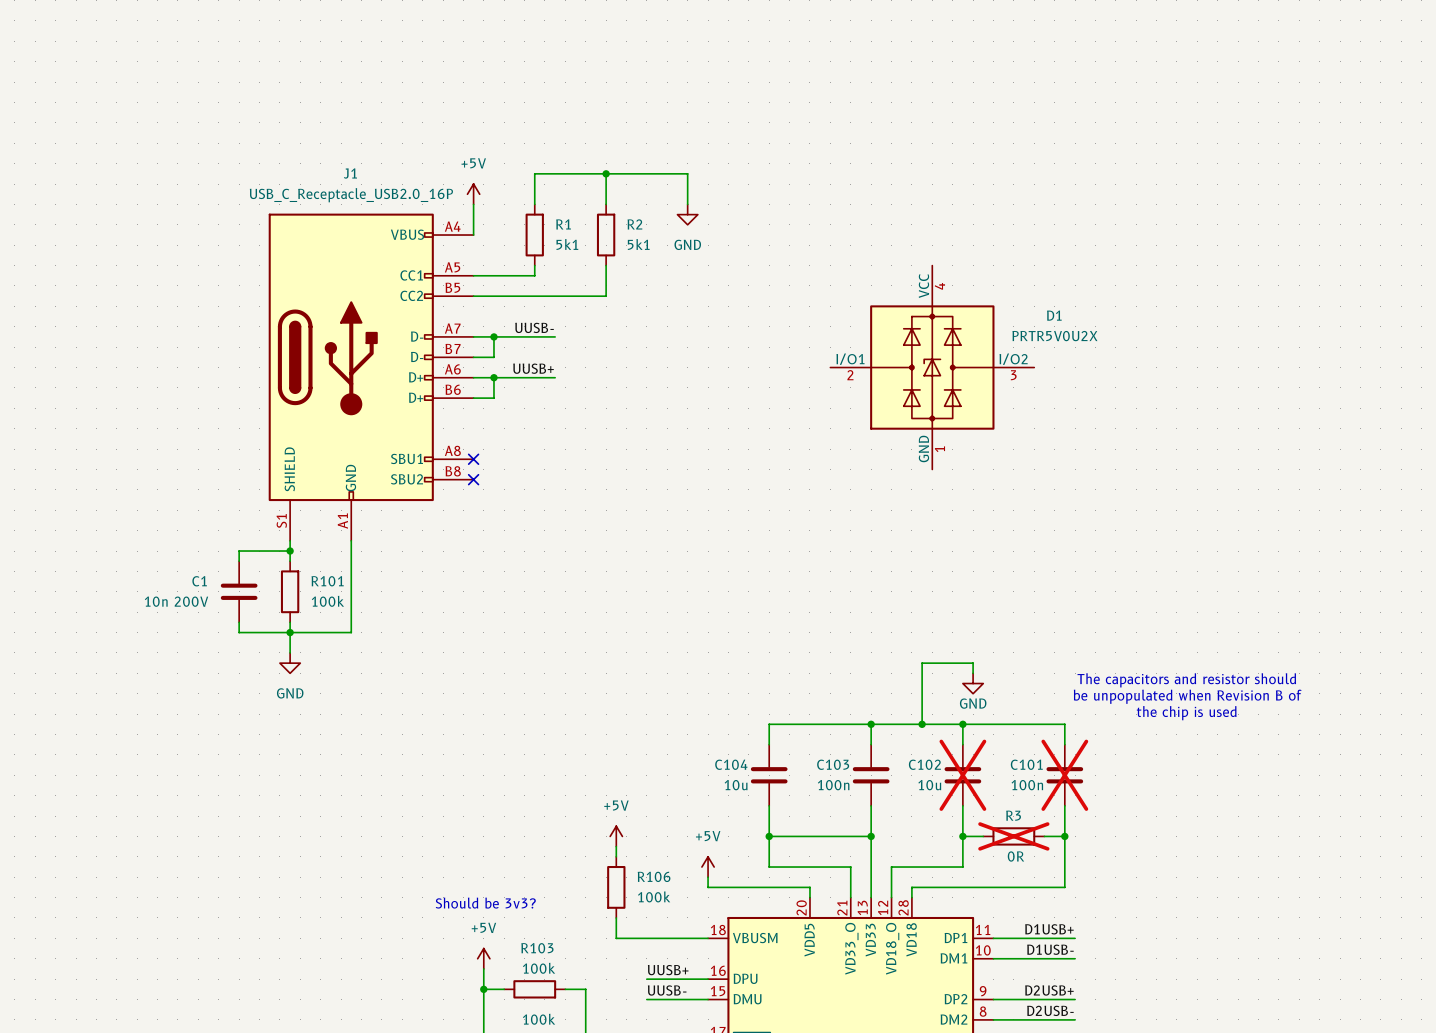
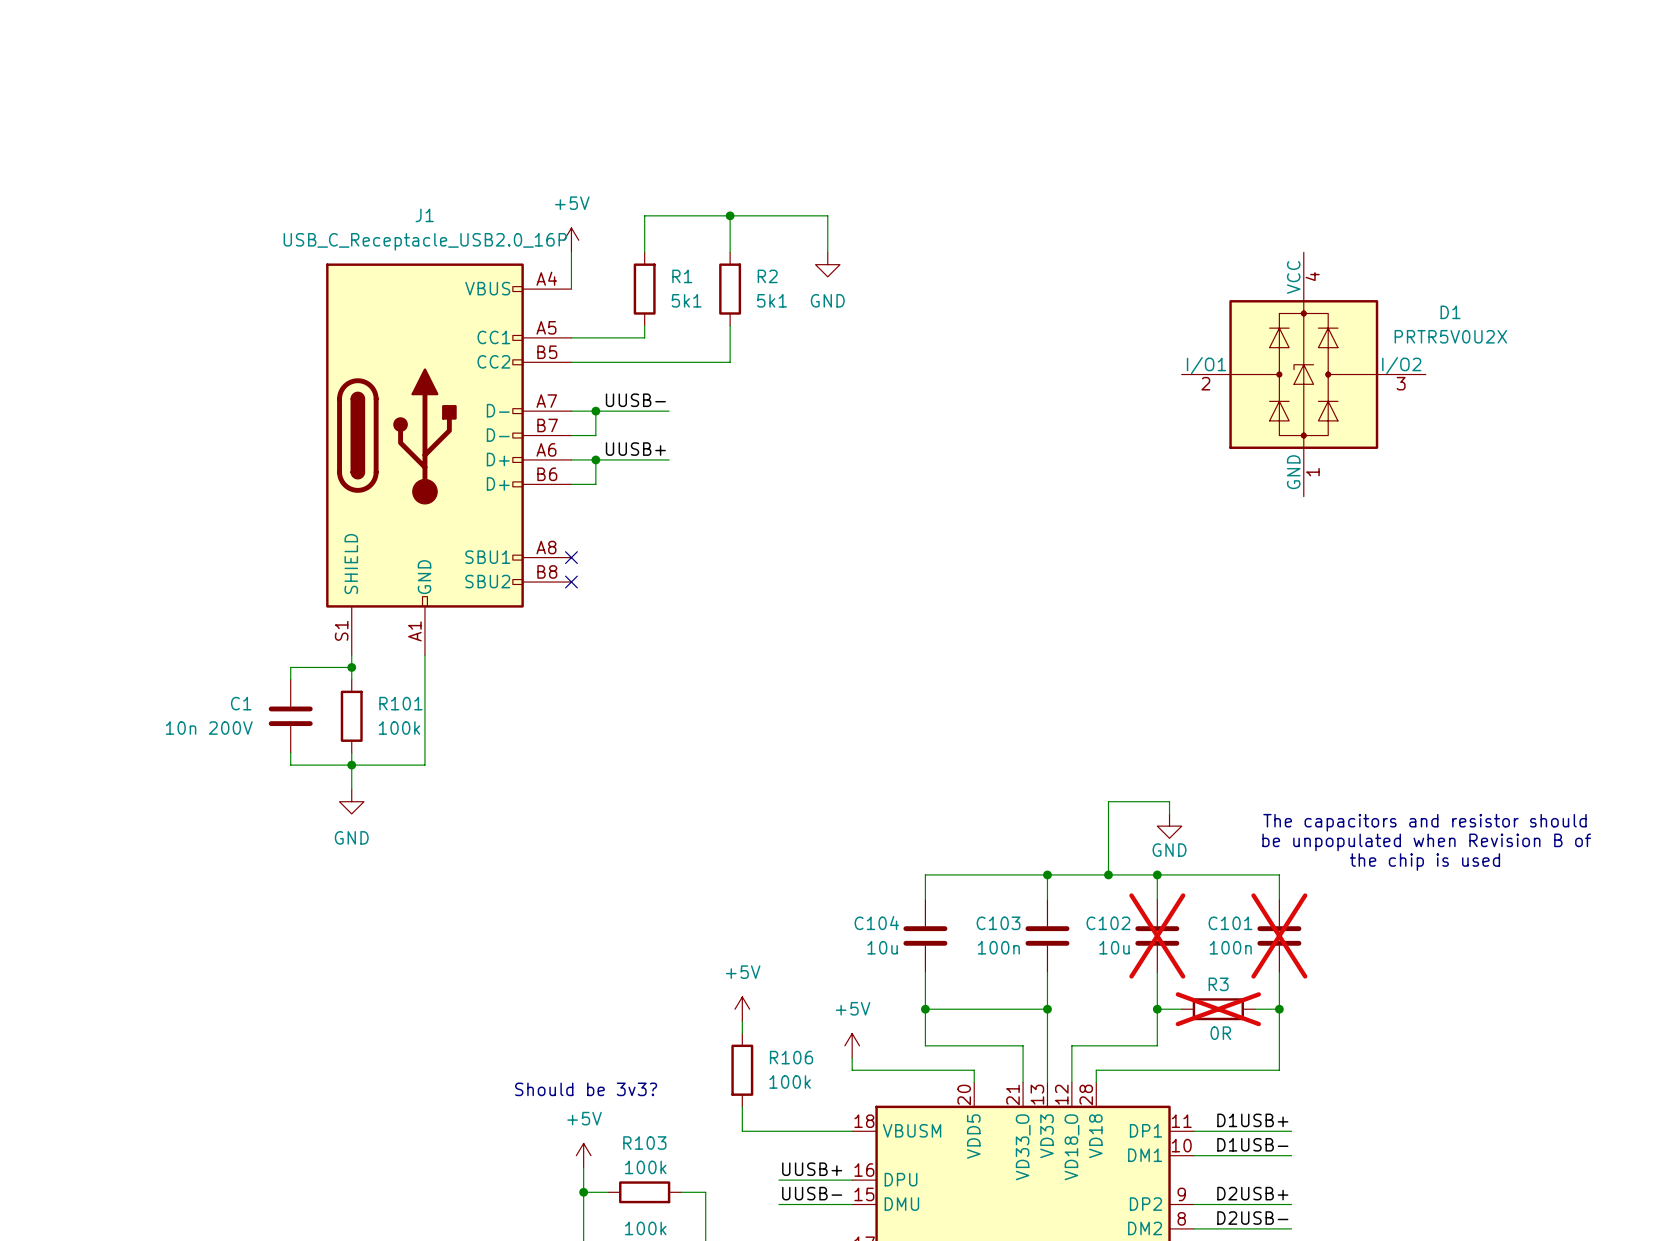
D1 position: (932, 367) -> (1303, 374)

